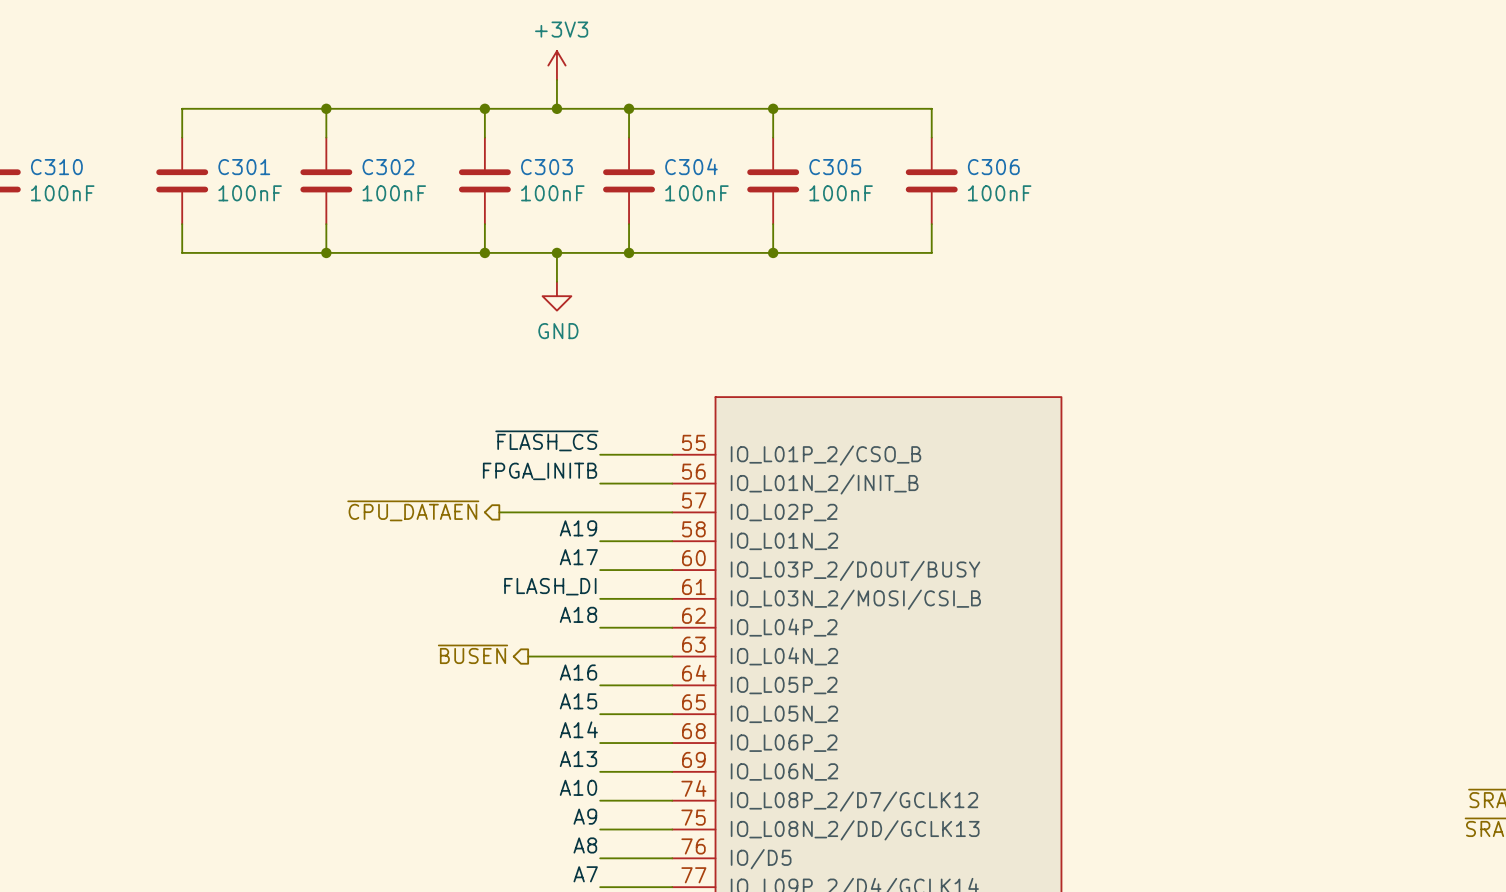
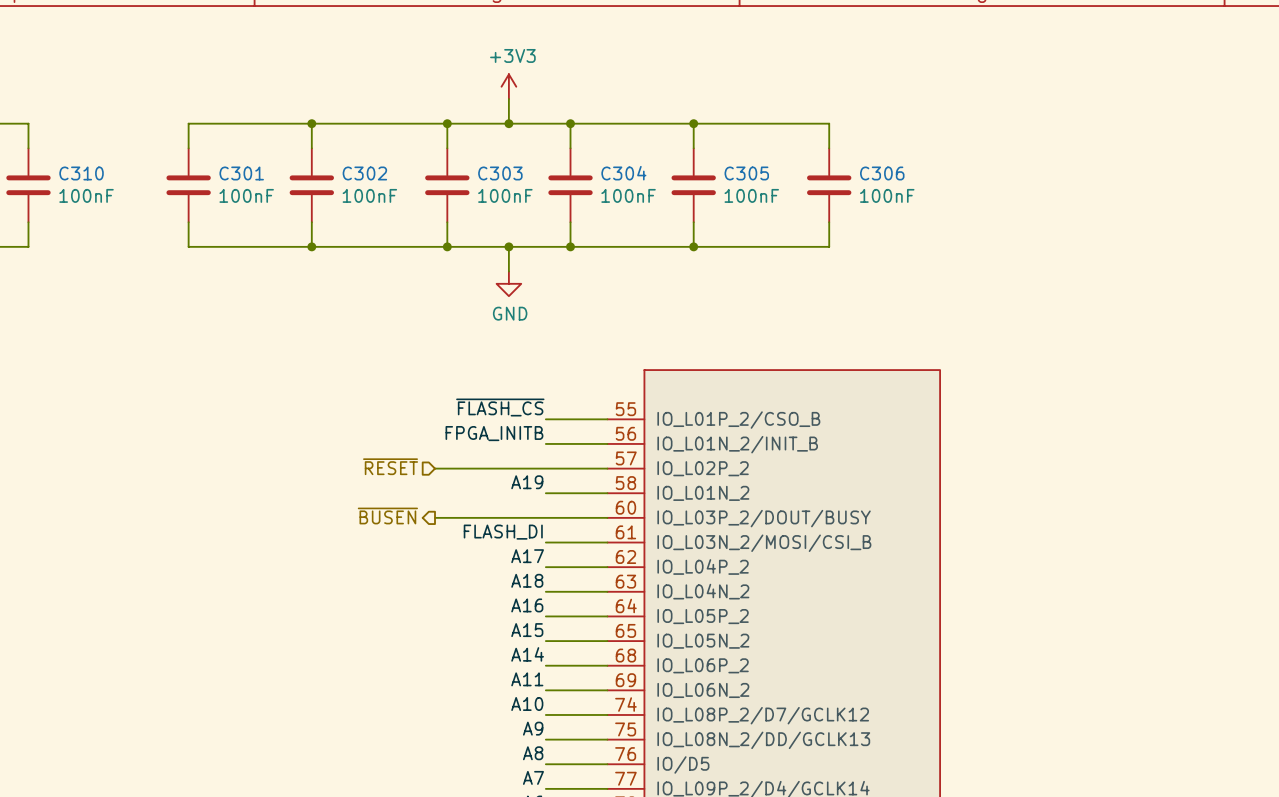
hierarchical label: ~{CPU_DATAEN} (413, 510) -> none
hierarchical label: none -> ~{RESET} (390, 466)
wire: none -> (435, 468) (459, 468)
label: A17 (578, 557) -> none
wire: none -> (435, 517) (545, 517)
label: A18 (578, 614) -> A17 (527, 556)
label: none -> A18 (527, 580)
hierarchical label position: ~{BUSEN} (473, 654) -> ~{BUSEN} (387, 516)
wire: (528, 656) (600, 656) -> none
label: A13 (578, 758) -> A11 (527, 679)

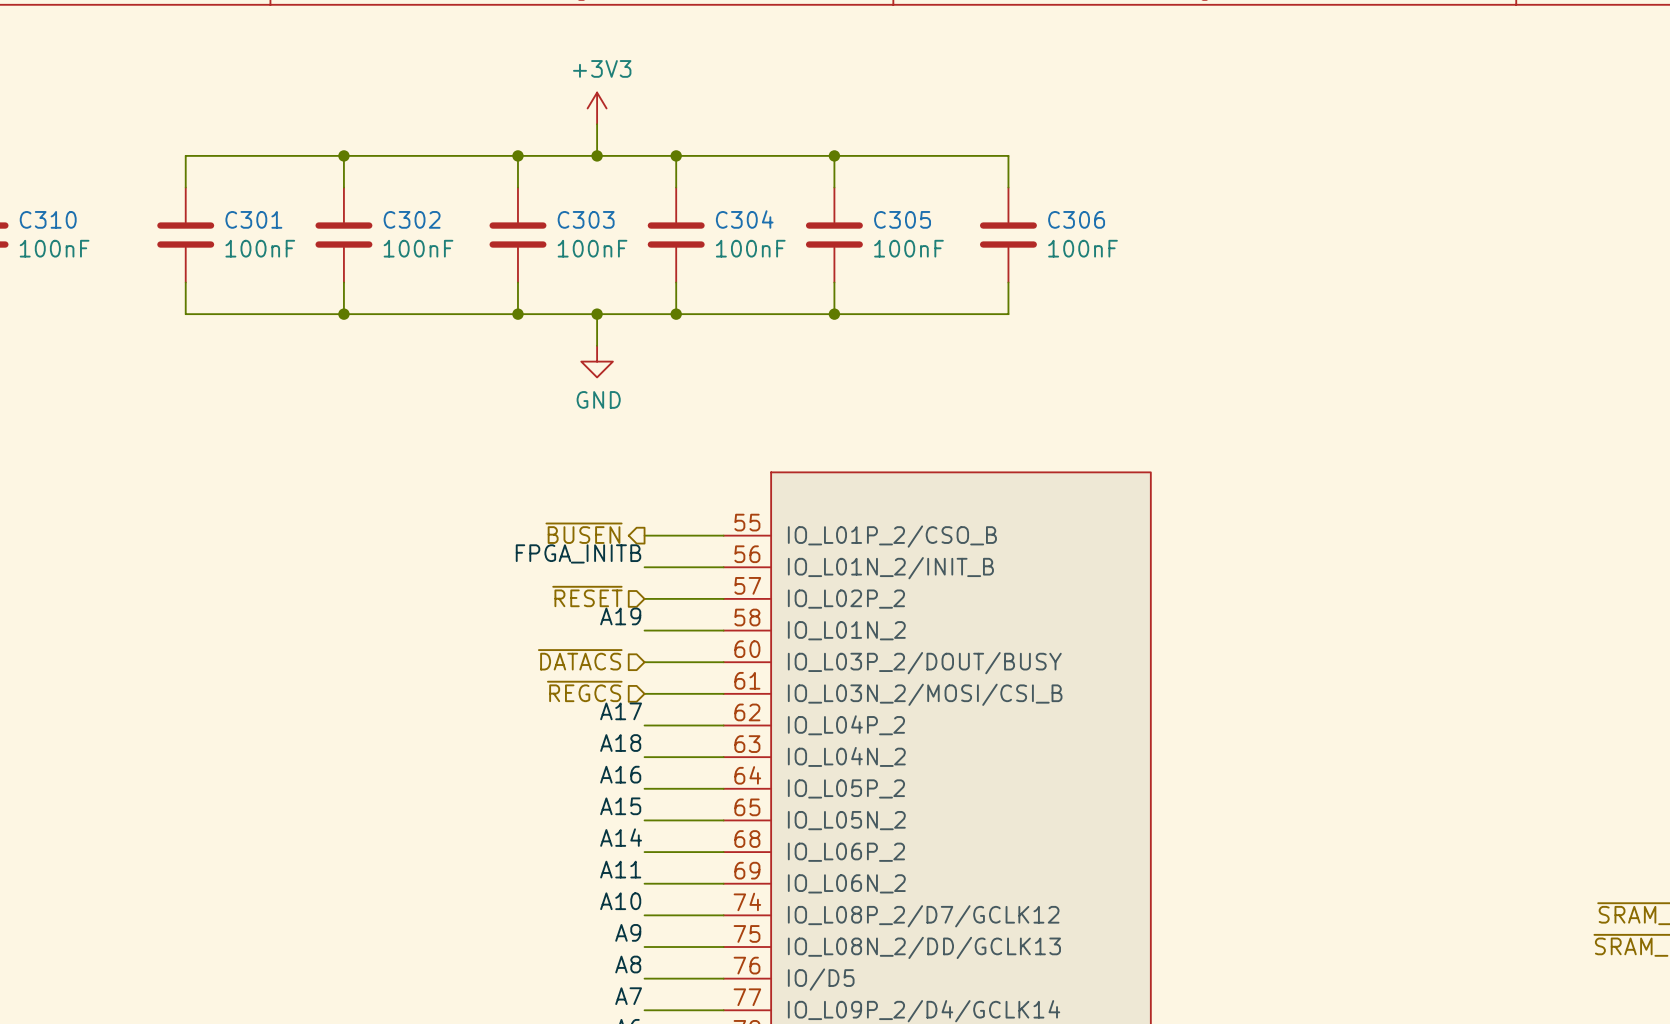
label: ~{FLASH_CS} (500, 407) -> none
hierarchical label position: ~{RESET} (390, 466) -> ~{RESET} (587, 596)
wire: (435, 468) (545, 468) -> none
hierarchical label position: ~{BUSEN} (387, 516) -> ~{BUSEN} (584, 533)
hierarchical label: none -> ~{DATACS} (580, 659)
wire: (435, 517) (545, 517) -> none
label: FLASH_DI (503, 532) -> none
hierarchical label: none -> ~{REGCS} (584, 691)

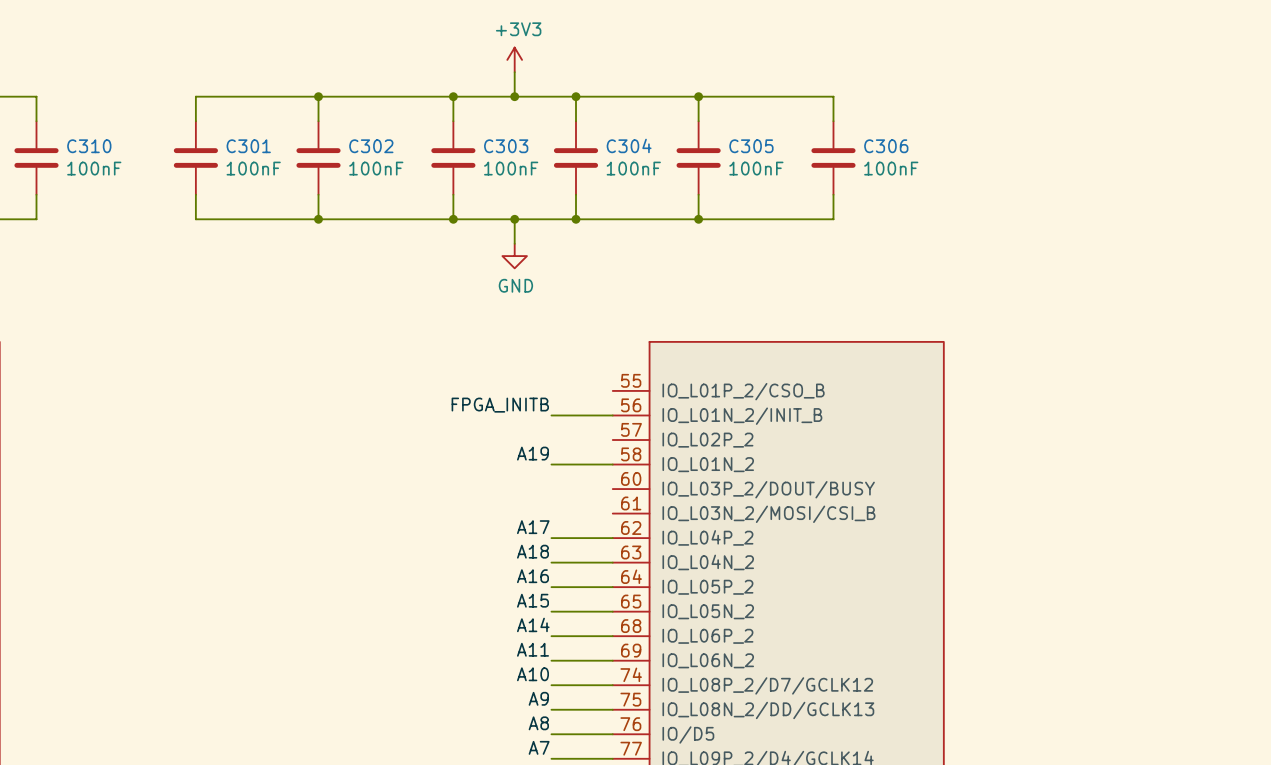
hierarchical label: ~{BUSEN} (584, 533) -> none
wire: (644, 535) (723, 535) -> none
hierarchical label: ~{RESET} (587, 596) -> none
wire: (644, 598) (723, 598) -> none
hierarchical label: ~{DATACS} (580, 659) -> none
wire: (644, 662) (723, 662) -> none
hierarchical label: ~{REGCS} (584, 691) -> none
wire: (644, 693) (723, 693) -> none

